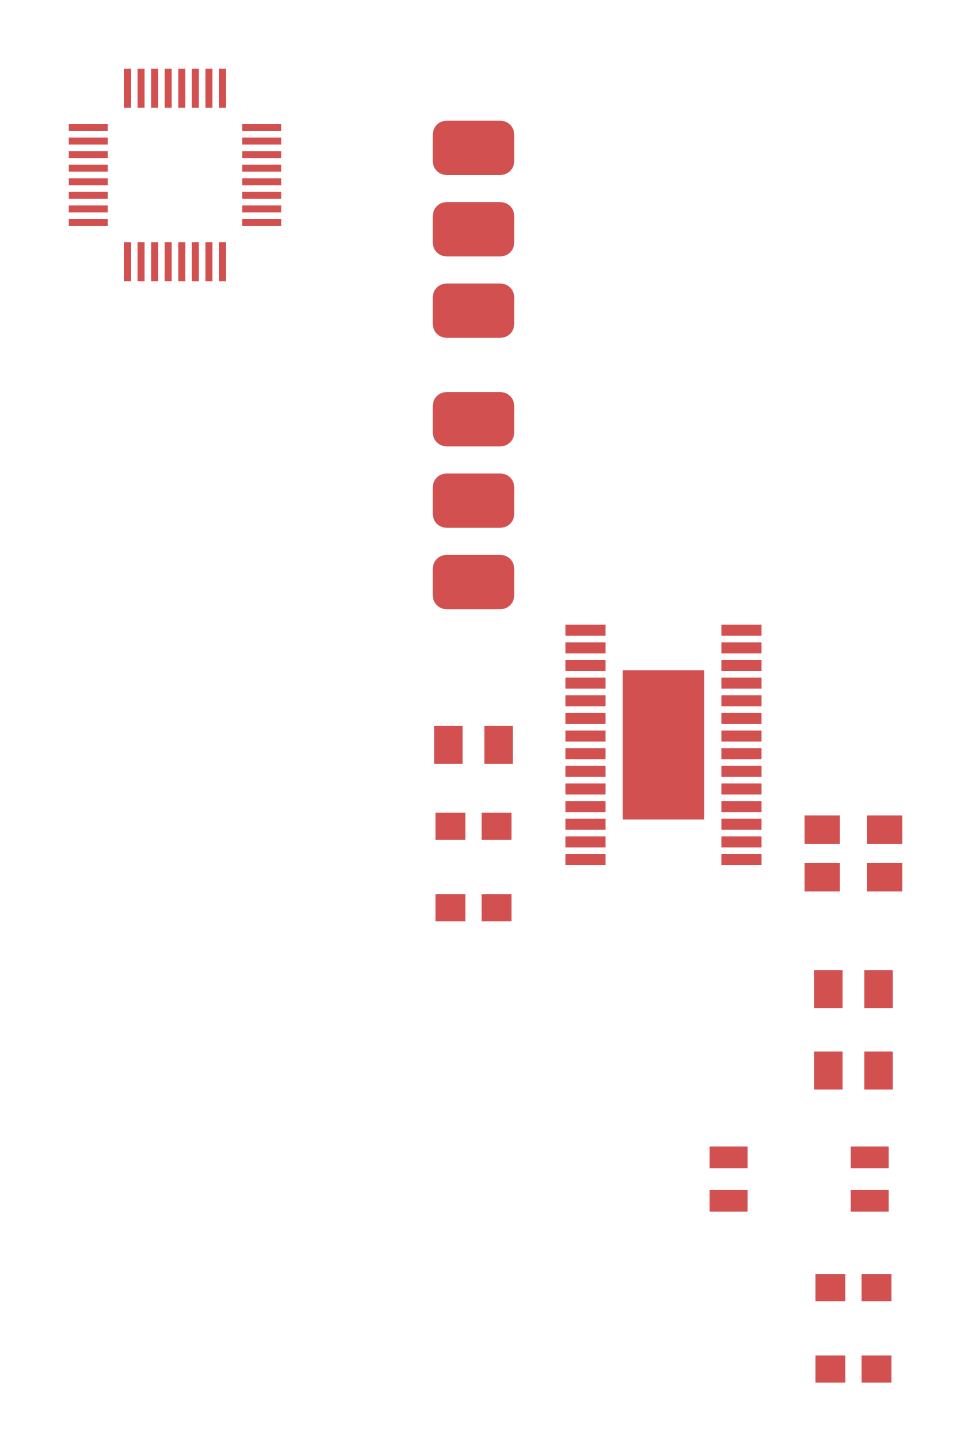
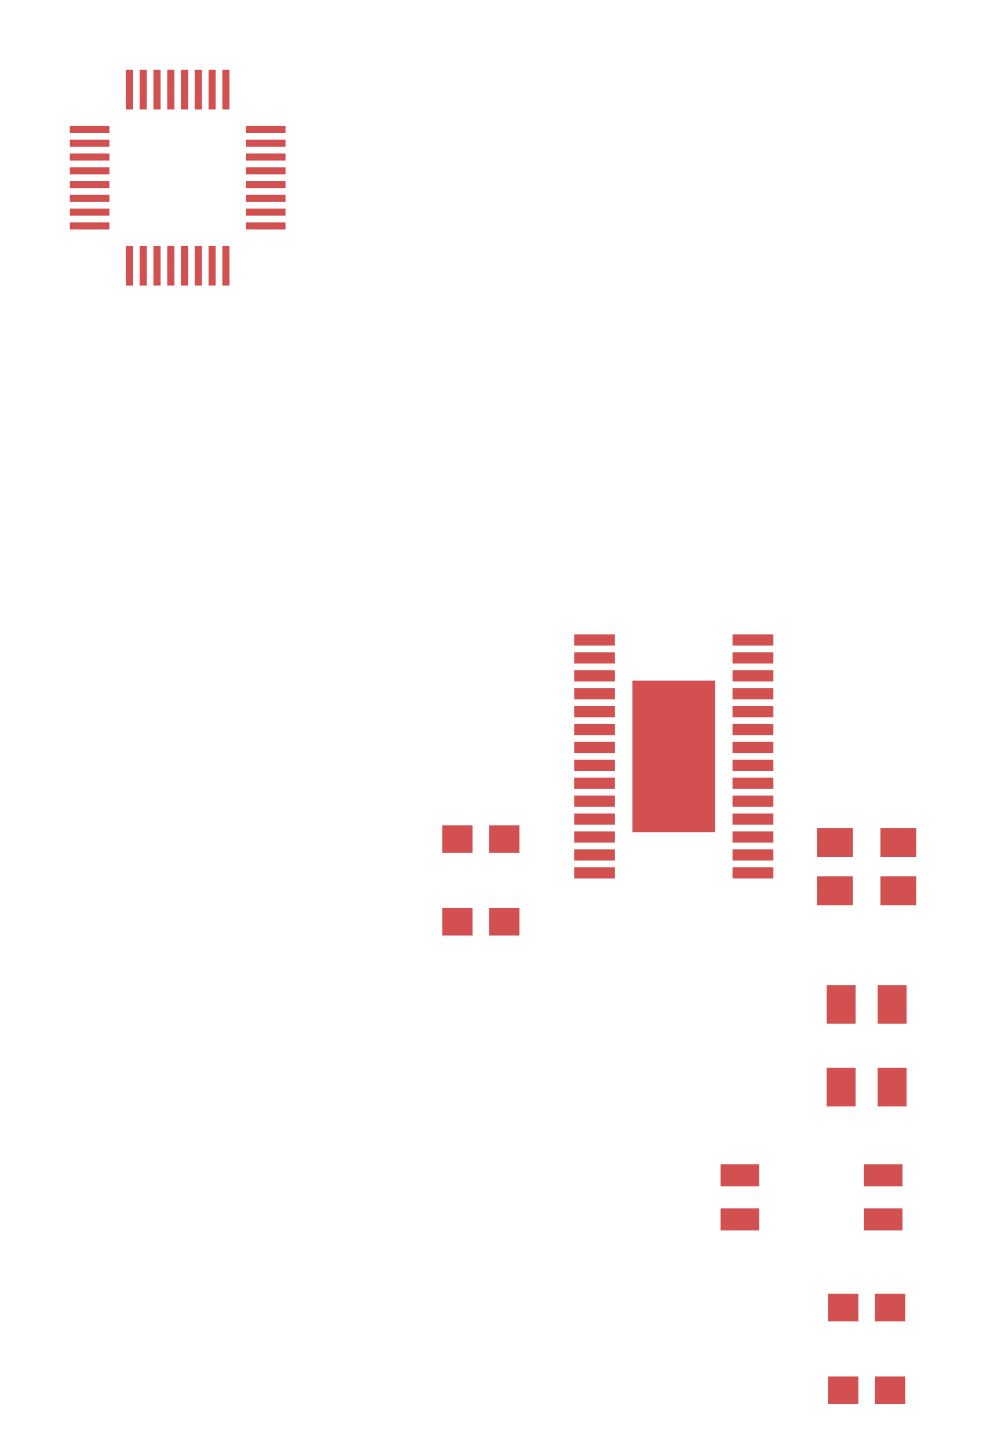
part: (473, 229) -> none
part: (473, 500) -> none
part: (473, 744) -> none

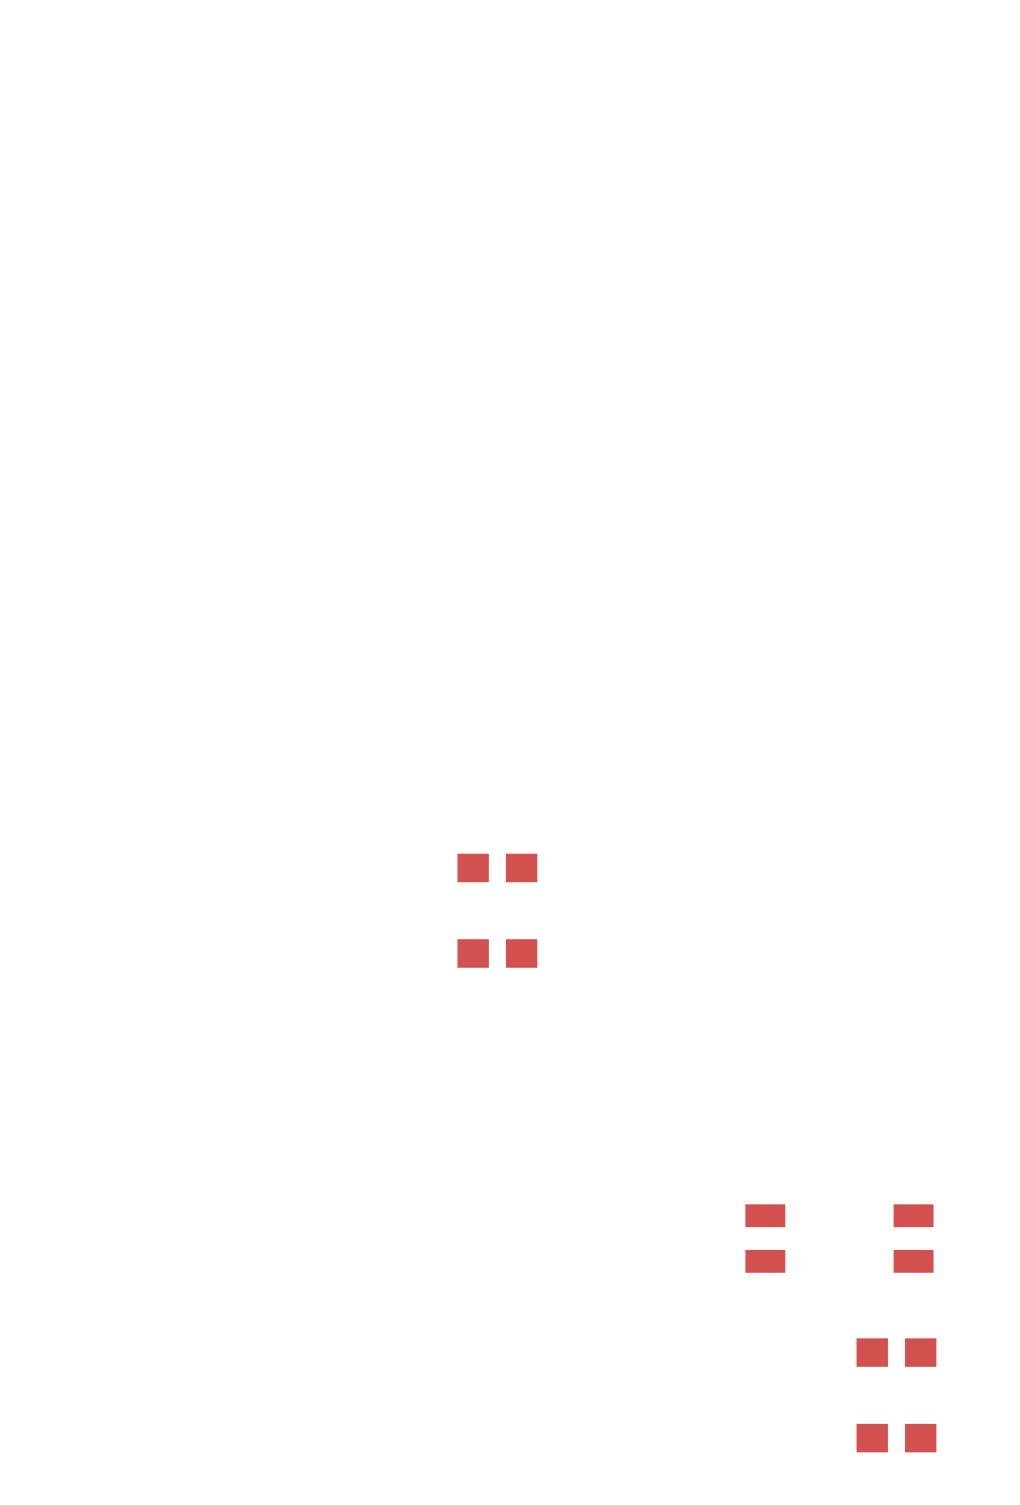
part: (177, 177) -> none
part: (673, 756) -> none
part: (866, 866) -> none
part: (866, 1004) -> none
part: (866, 1087) -> none

